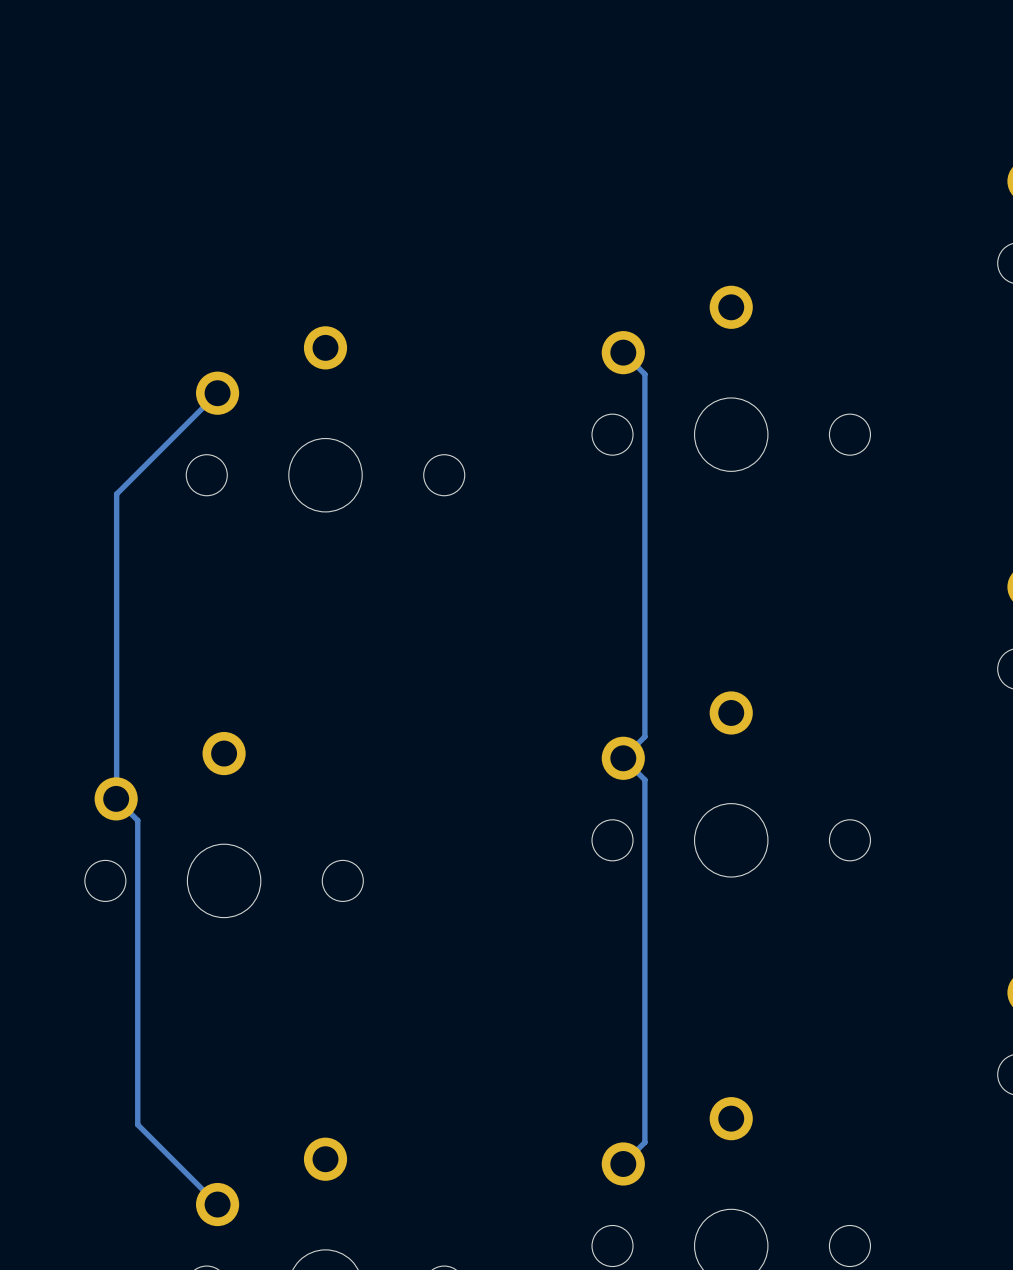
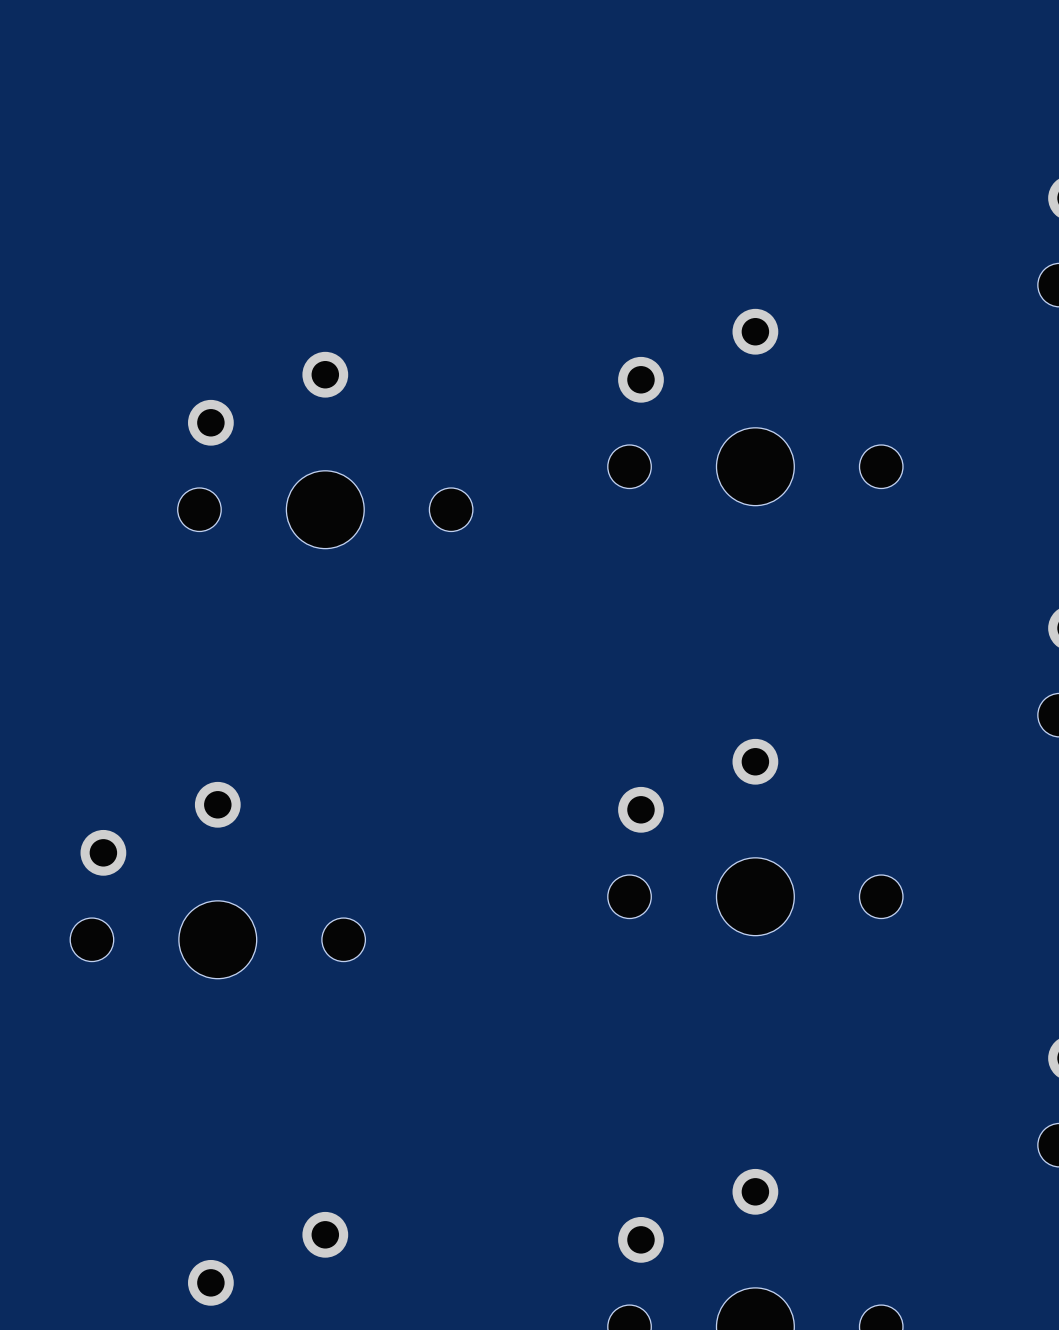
track: (623, 352) (644, 374) (644, 736) (623, 758) (644, 779) (644, 1142) (623, 1163) -> none
track: (217, 393) (116, 494) (116, 798) (137, 820) (137, 1124) (217, 1204) -> none

